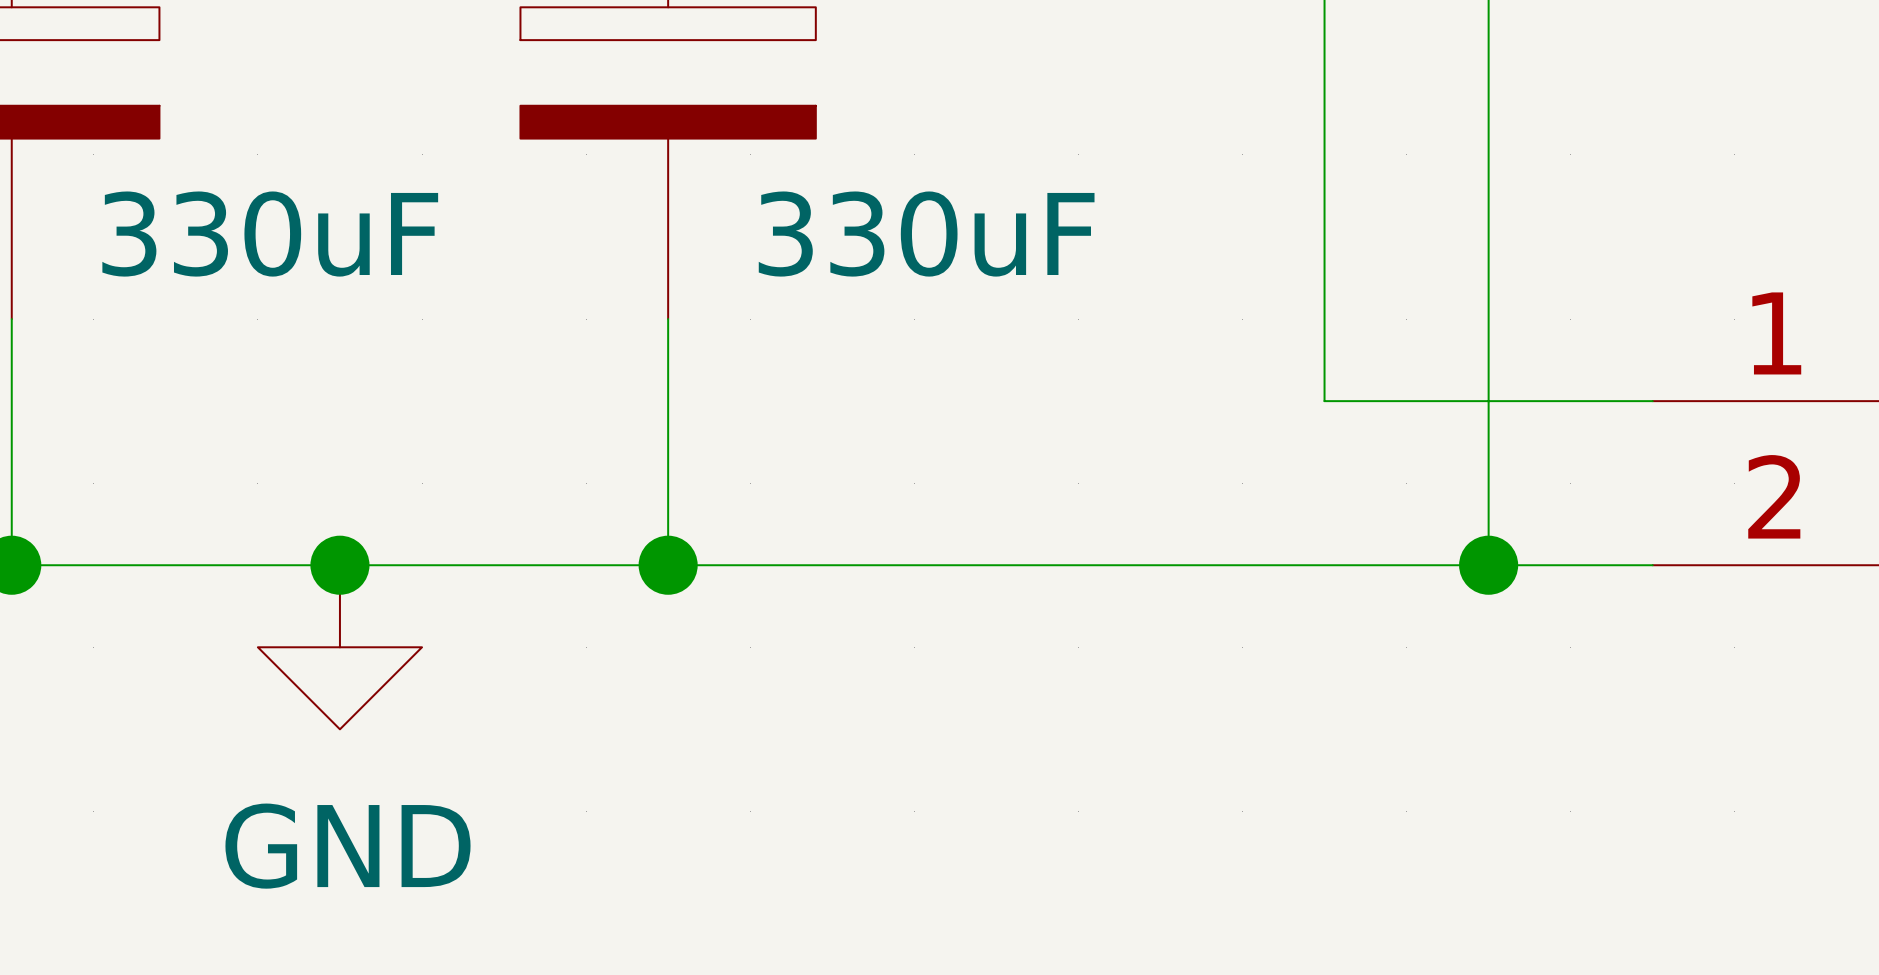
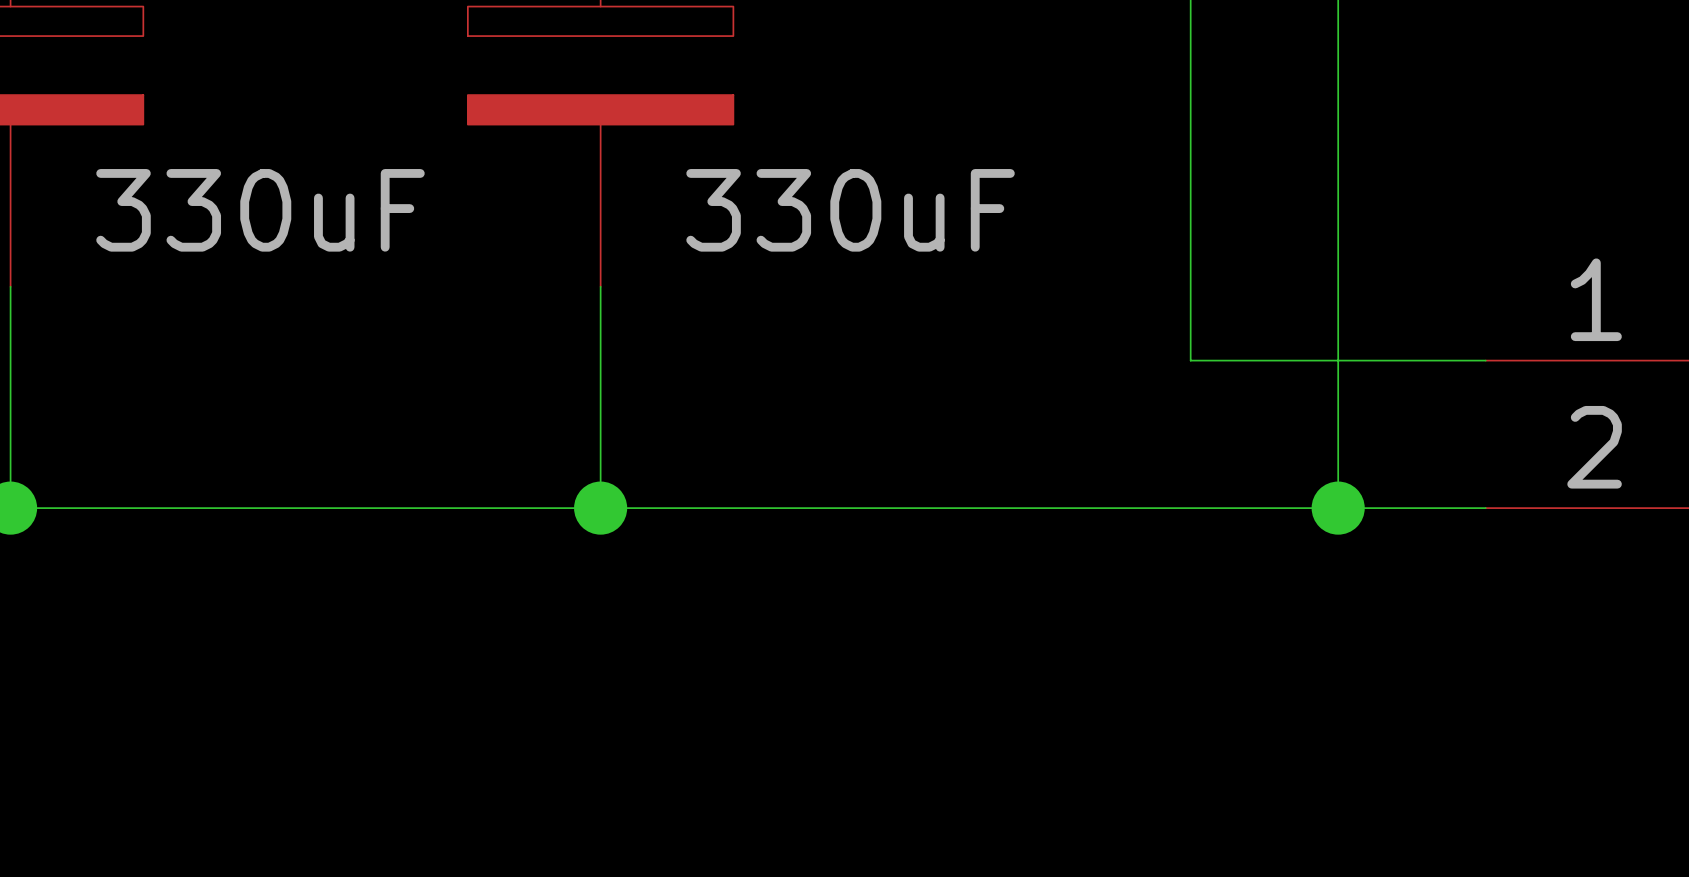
junction: (339, 565) -> none
power symbol: GND (339, 647) -> none

